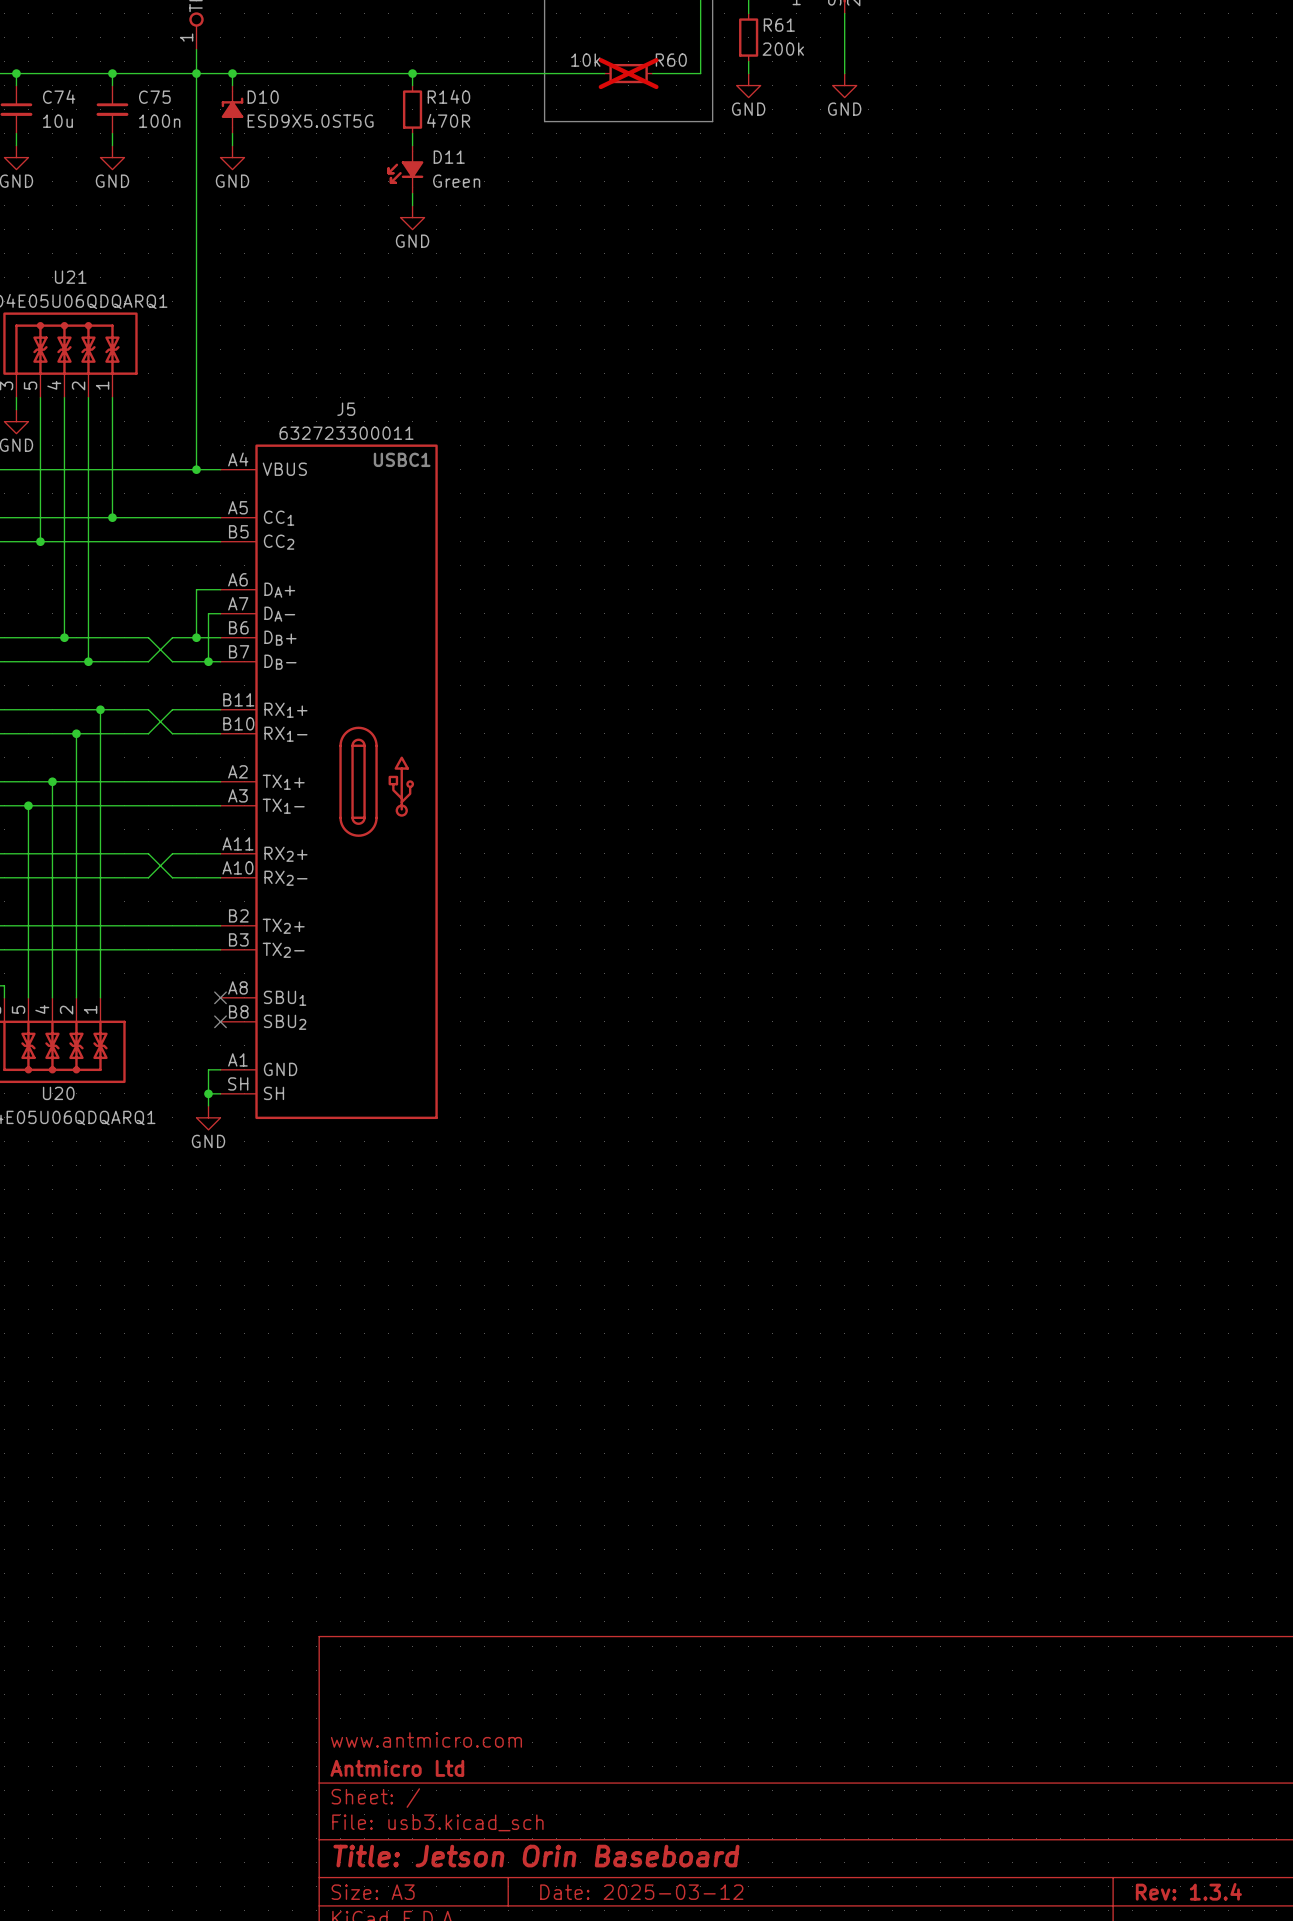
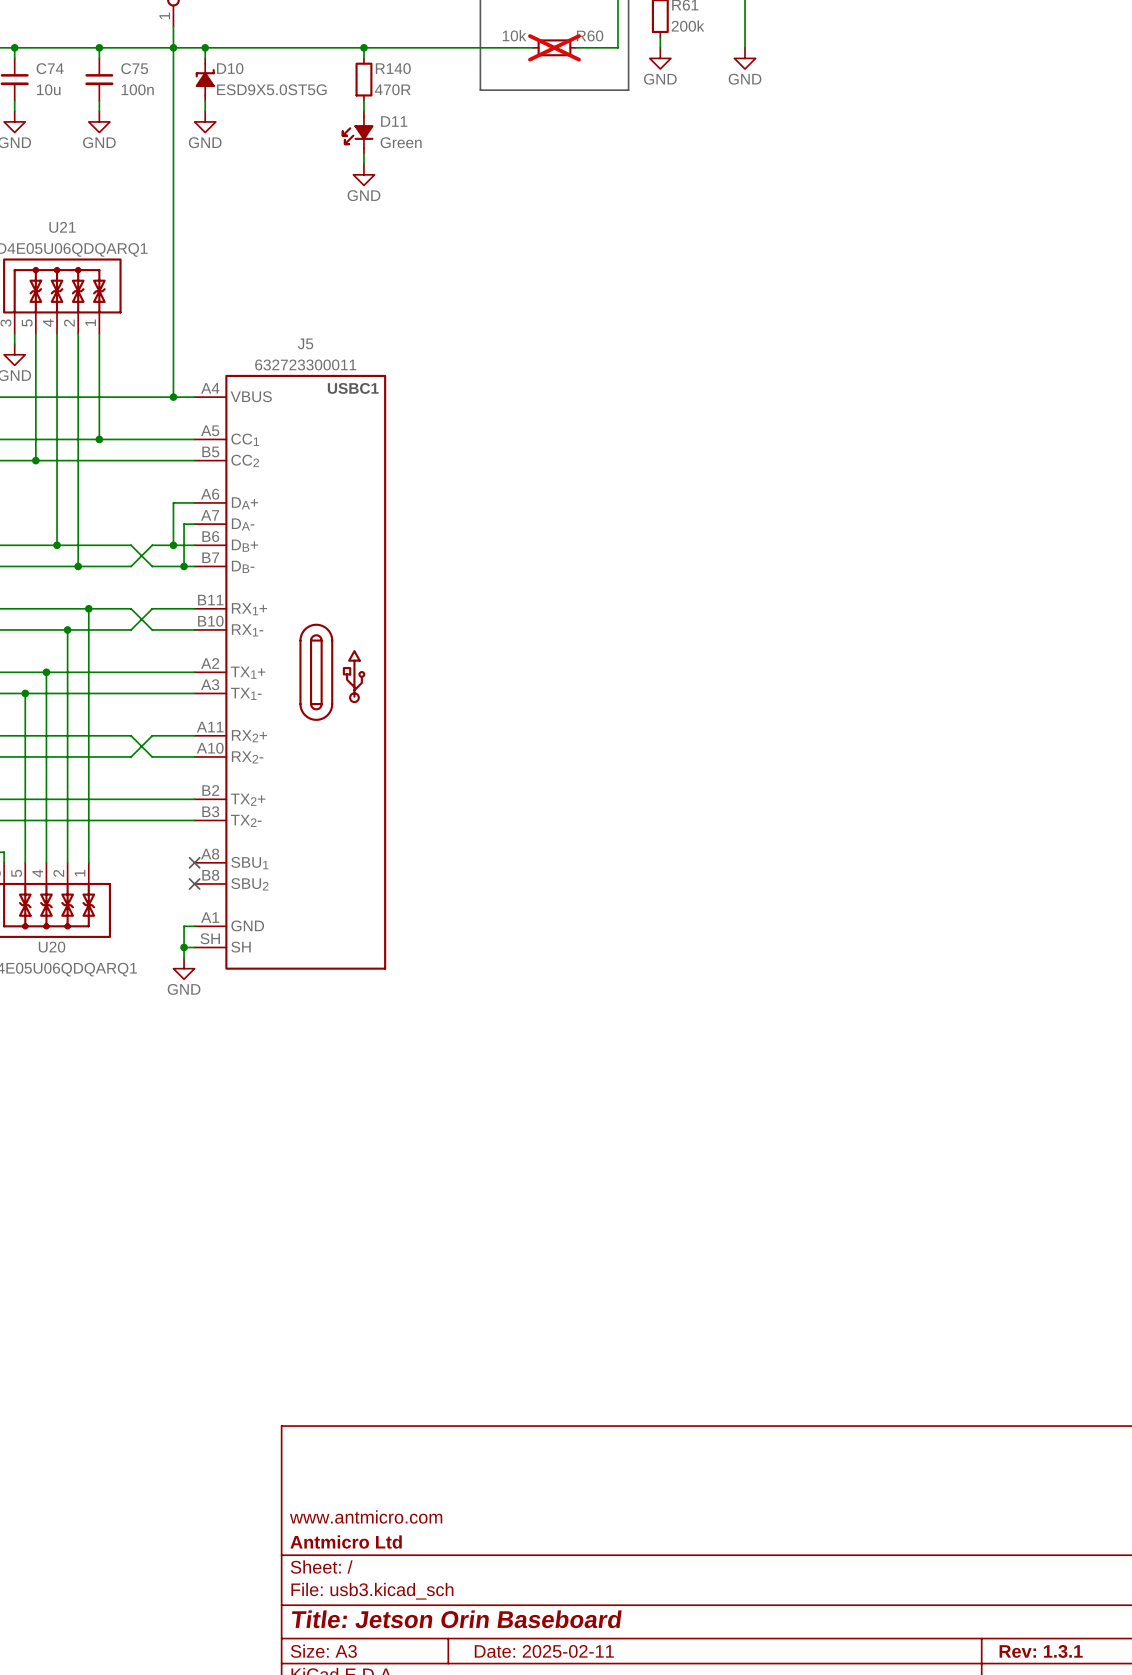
title block: Rev: 1.3.4 (1188, 1891) -> Rev: 1.3.1 (1041, 1651)
title block: Date: 2025-03-12 (641, 1892) -> Date: 2025-02-11 (544, 1651)

